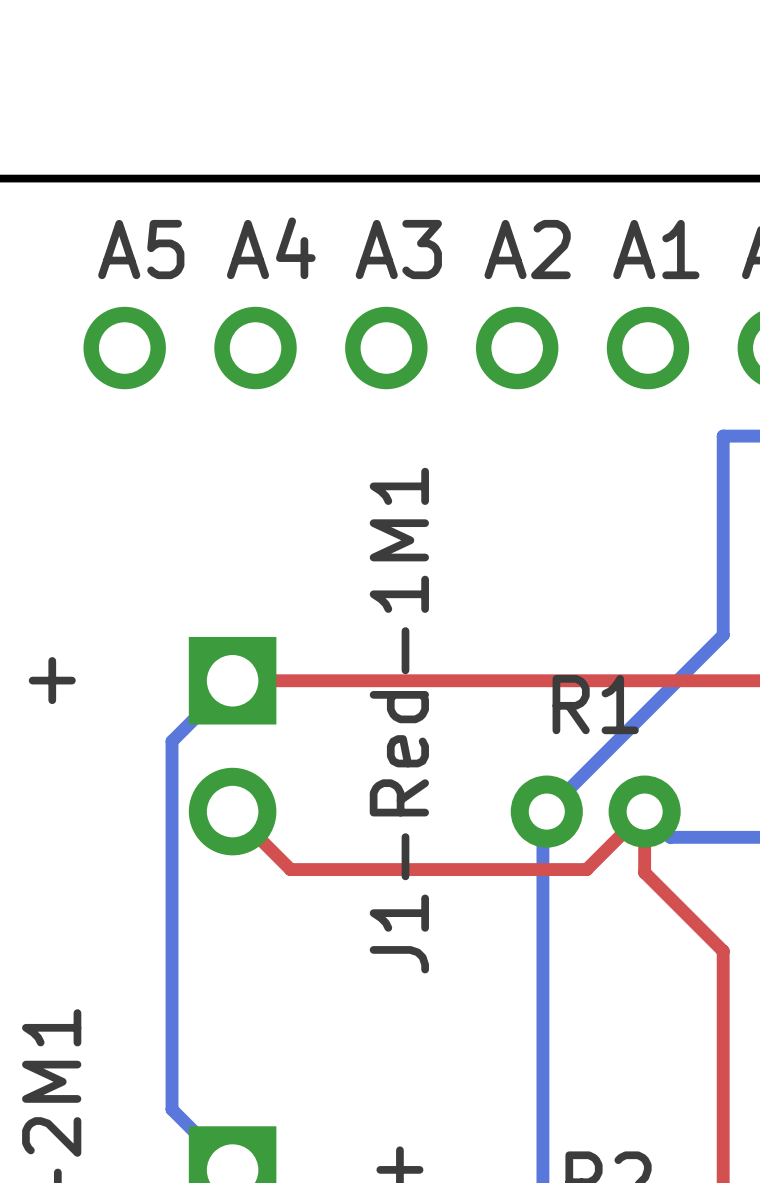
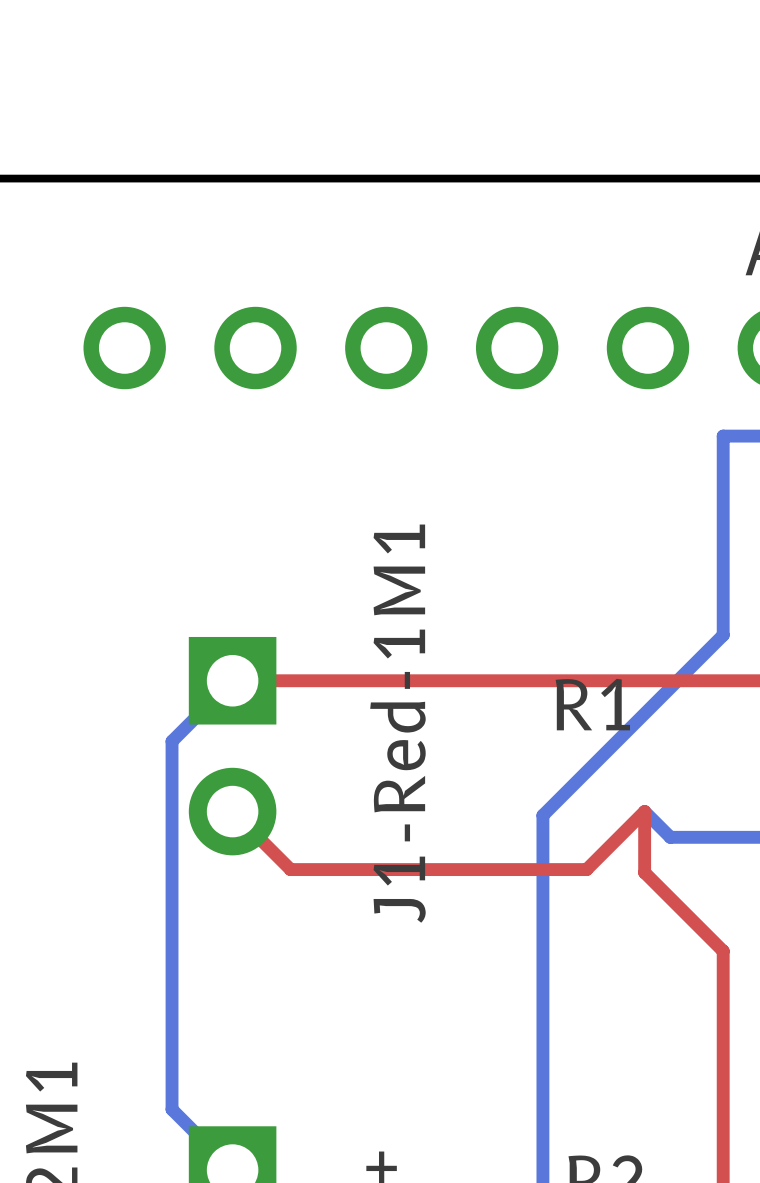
text: A4 (271, 248) -> none
text: A5 (141, 249) -> none
text: A3 (398, 249) -> none
text: A2 (527, 249) -> none
text: A1 (656, 249) -> none
text: + (52, 680) -> none
part: (595, 811) -> none

